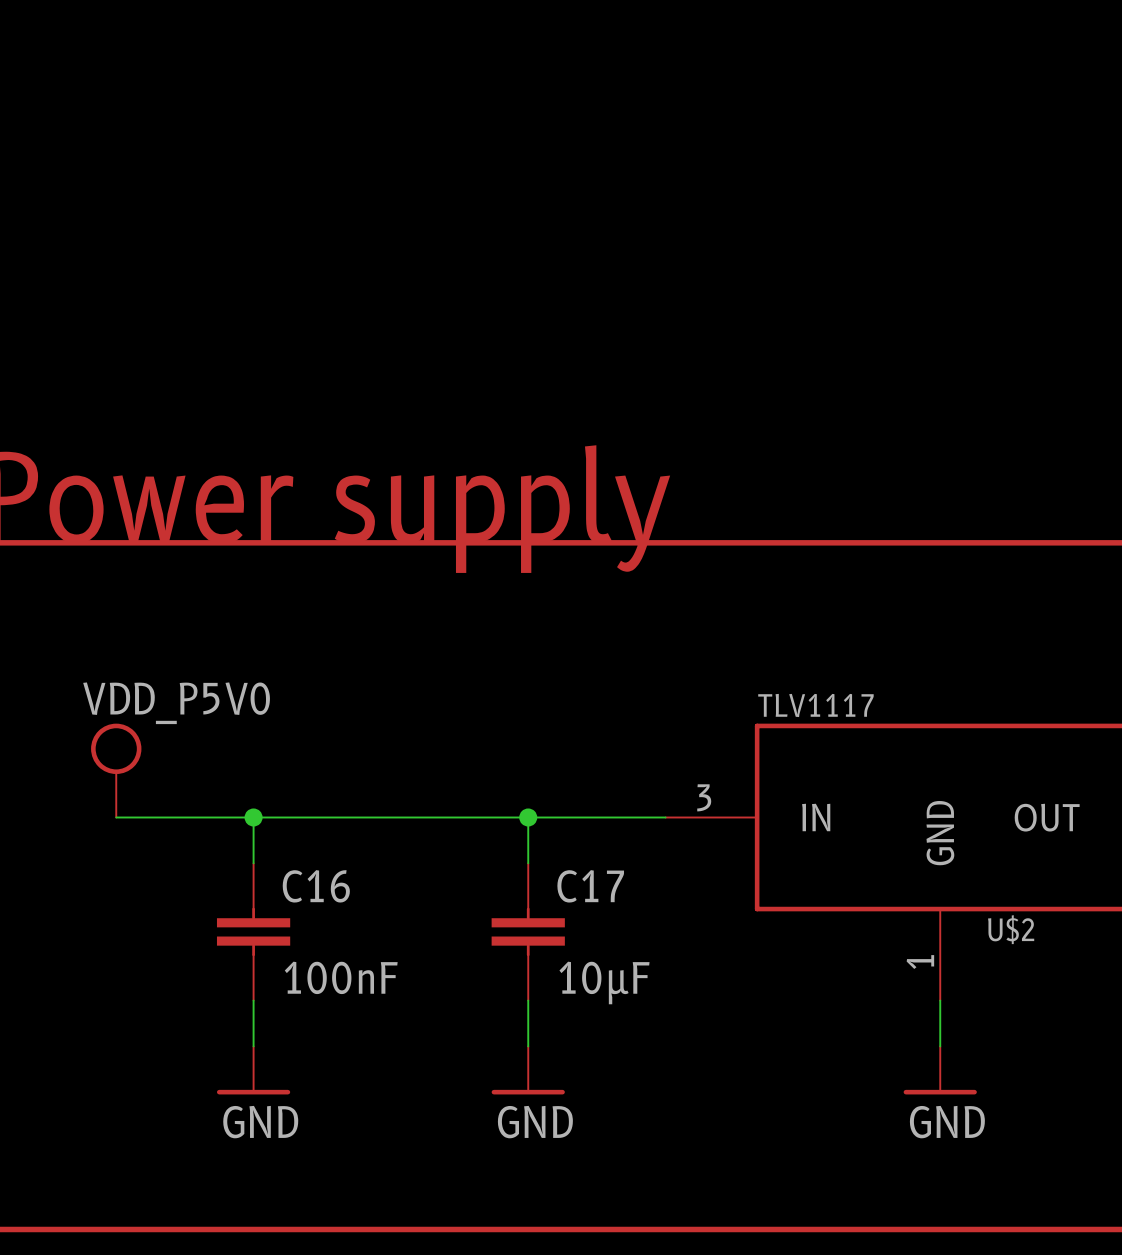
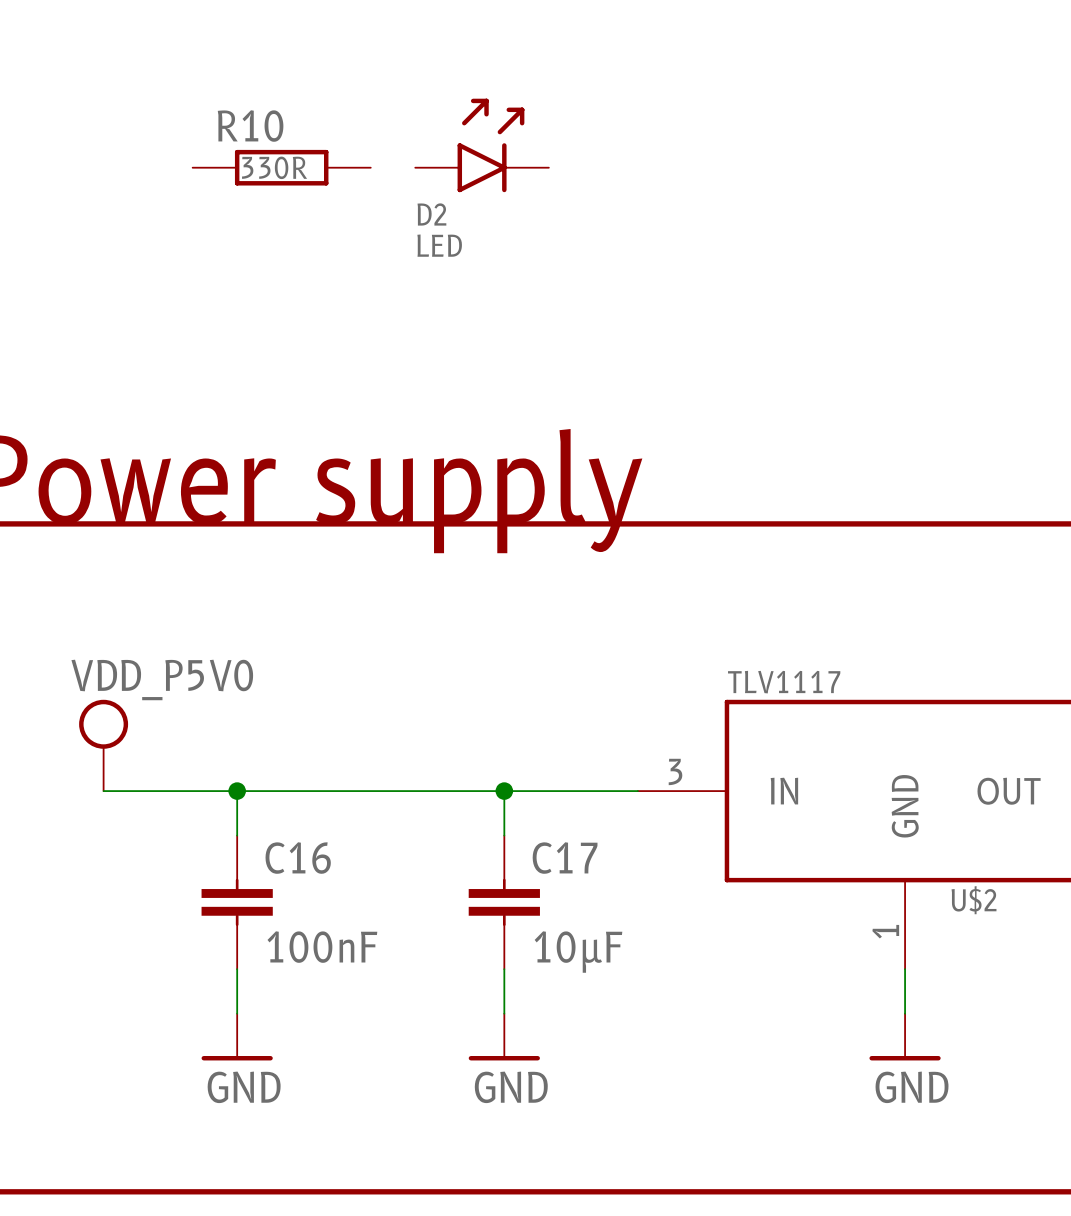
D2: none -> LED (482, 145)
R10: none -> 330R (281, 167)

